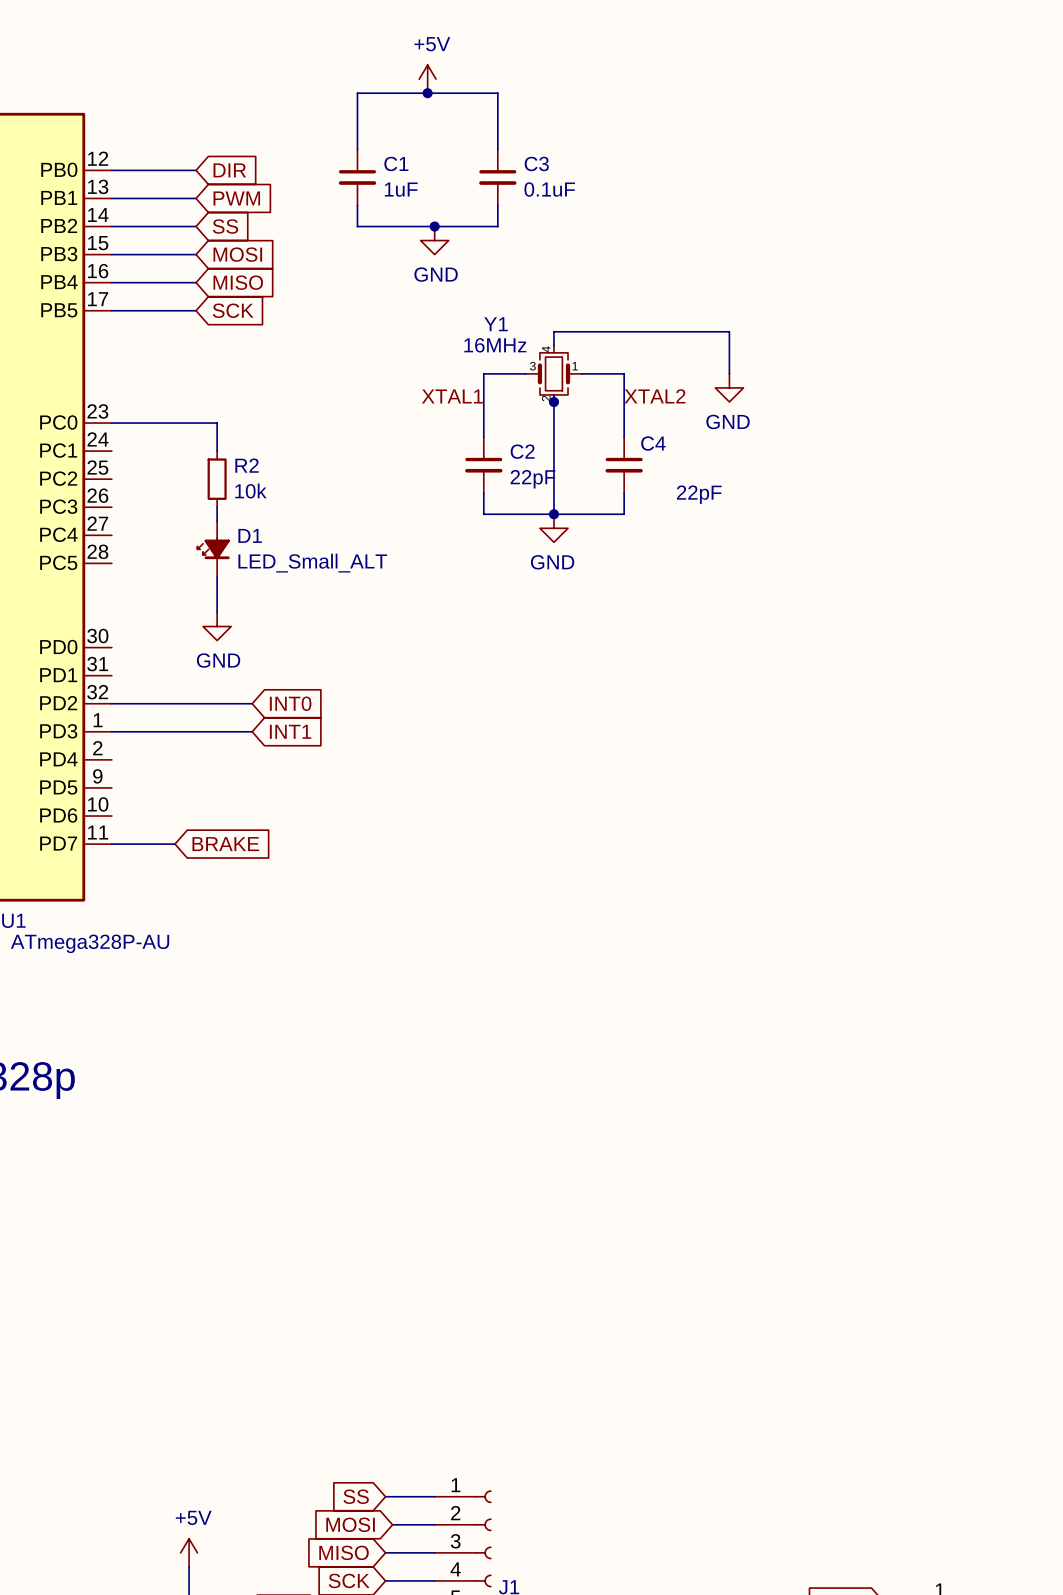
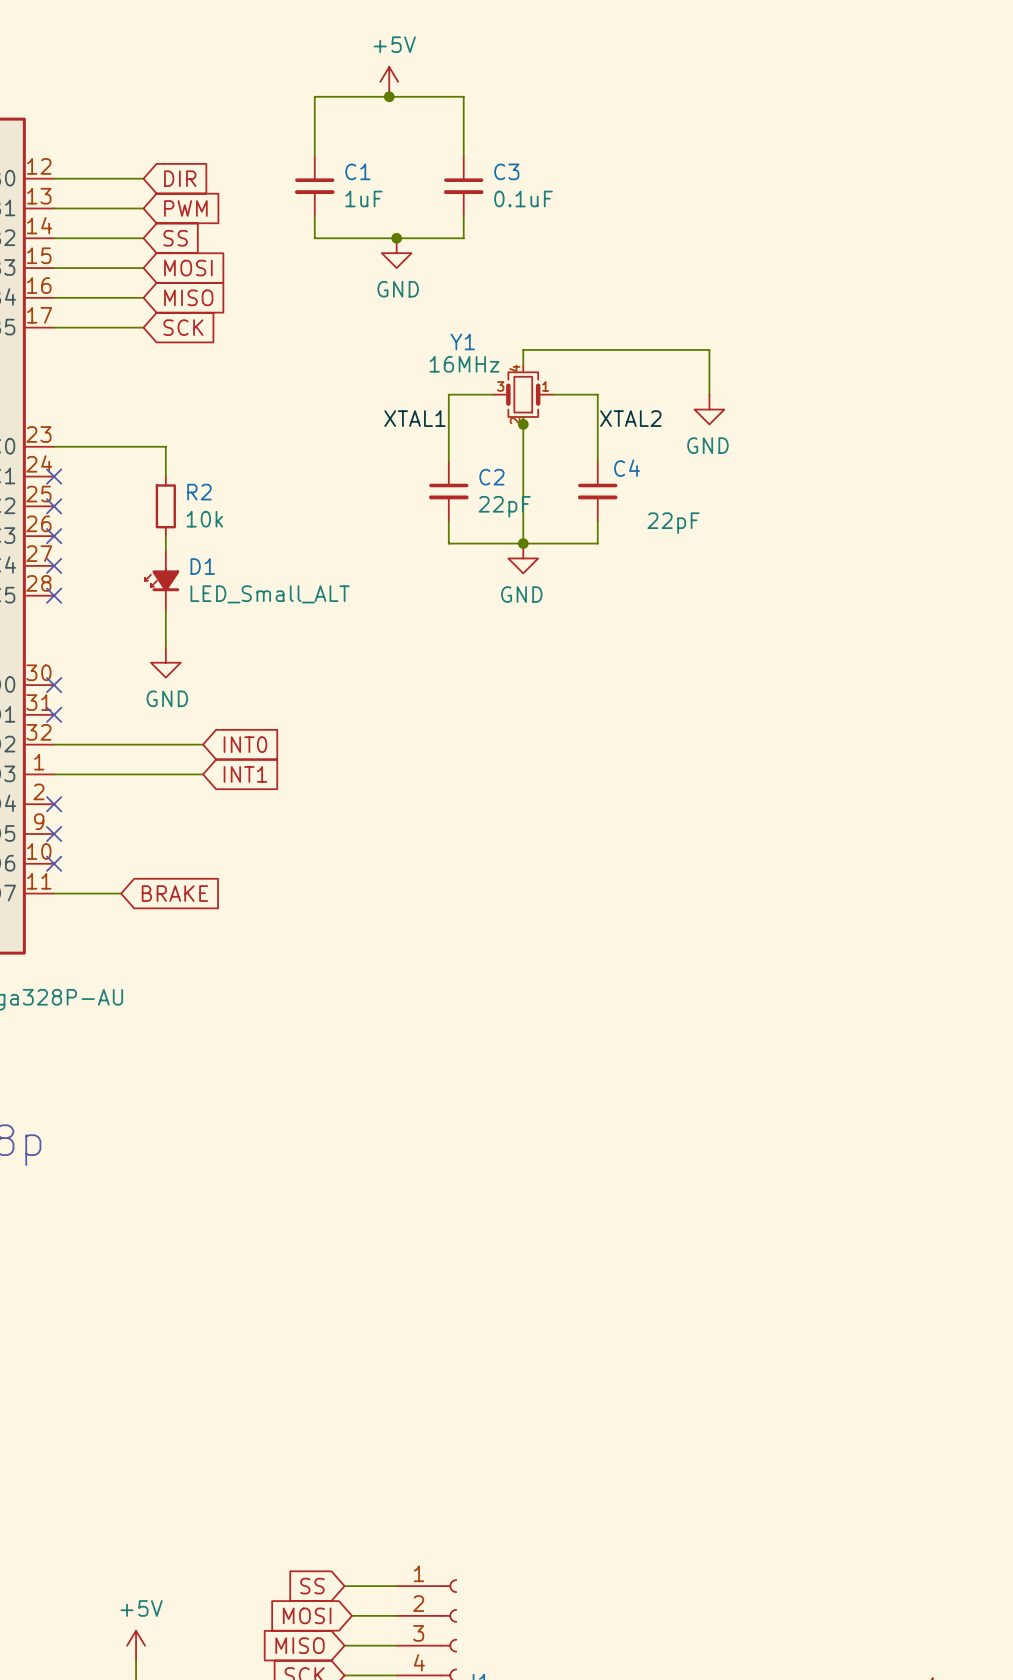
no-connect mark: none -> (54, 476)
no-connect mark: none -> (54, 506)
no-connect mark: none -> (54, 536)
no-connect mark: none -> (54, 565)
no-connect mark: none -> (54, 595)
no-connect mark: none -> (54, 685)
no-connect mark: none -> (54, 714)
no-connect mark: none -> (54, 804)
no-connect mark: none -> (54, 833)
no-connect mark: none -> (54, 863)

